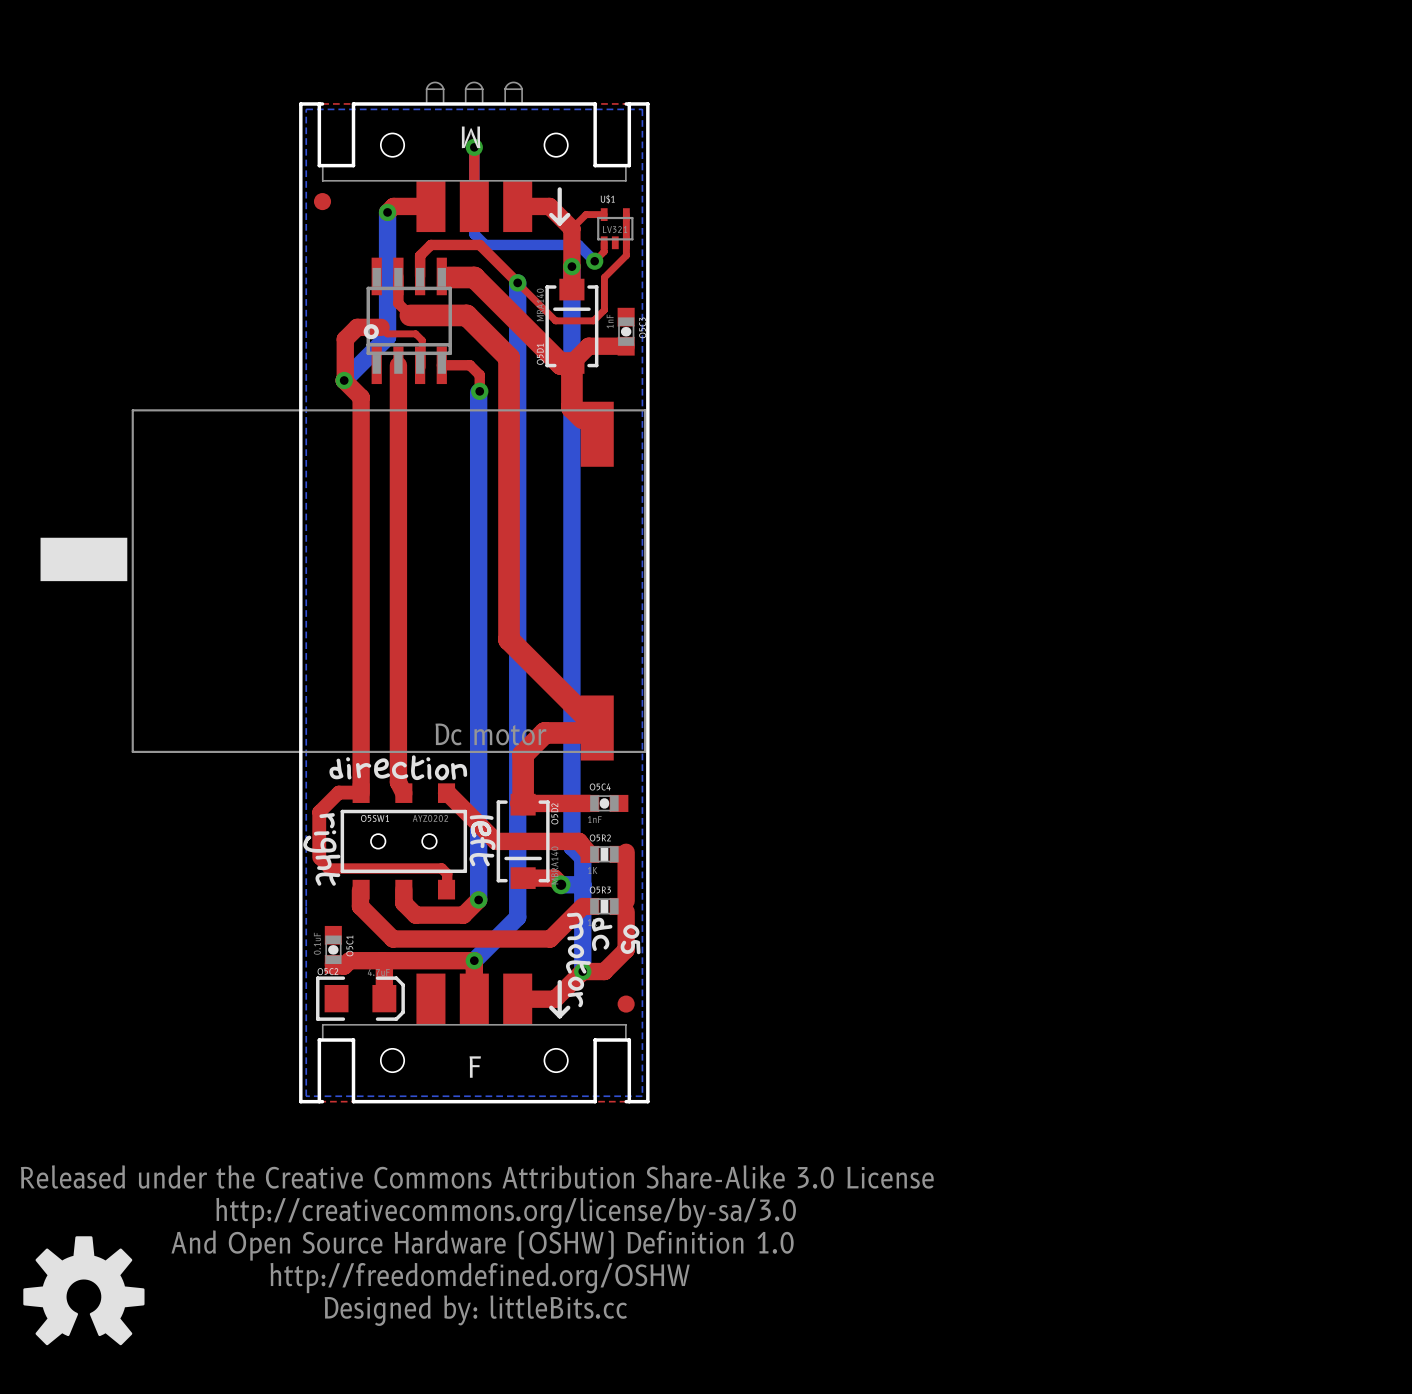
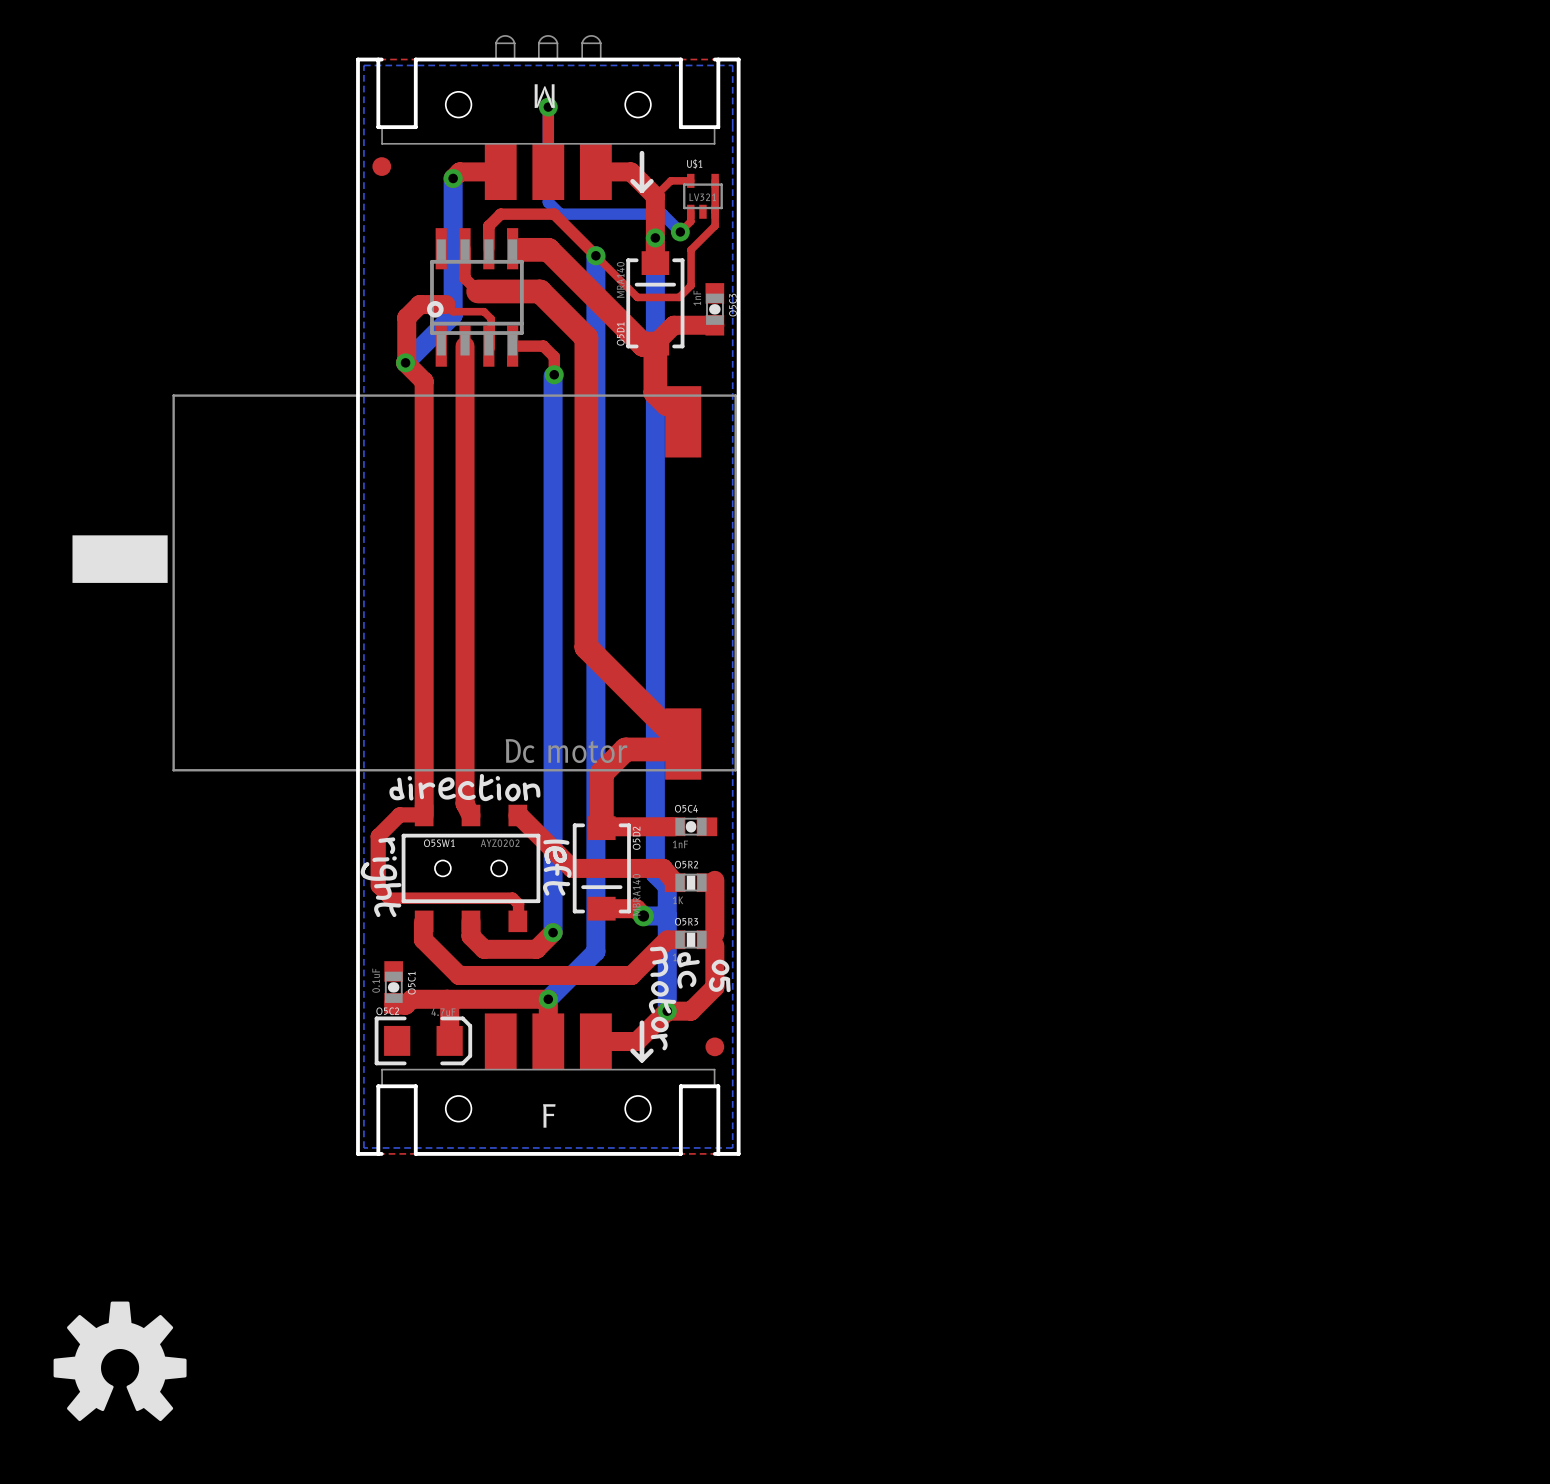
drawing: [20, 1165, 934, 1326] -> none

